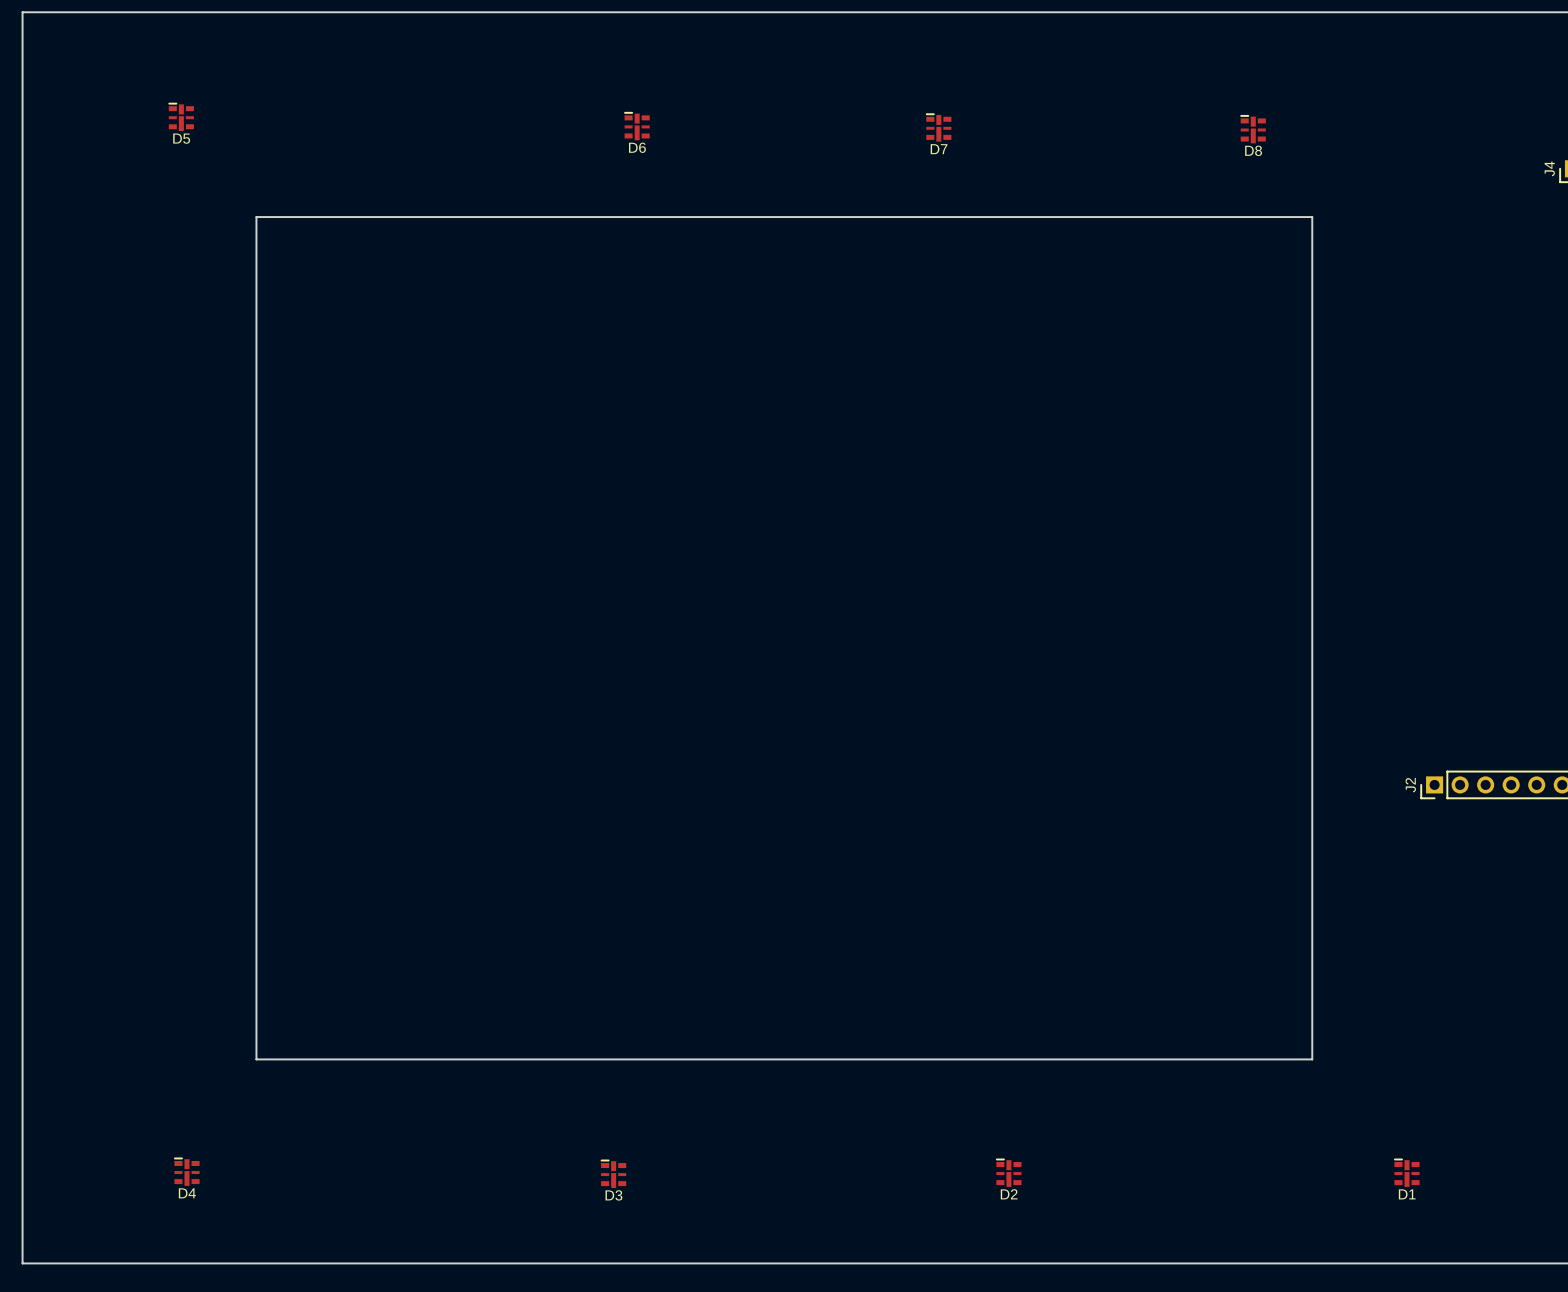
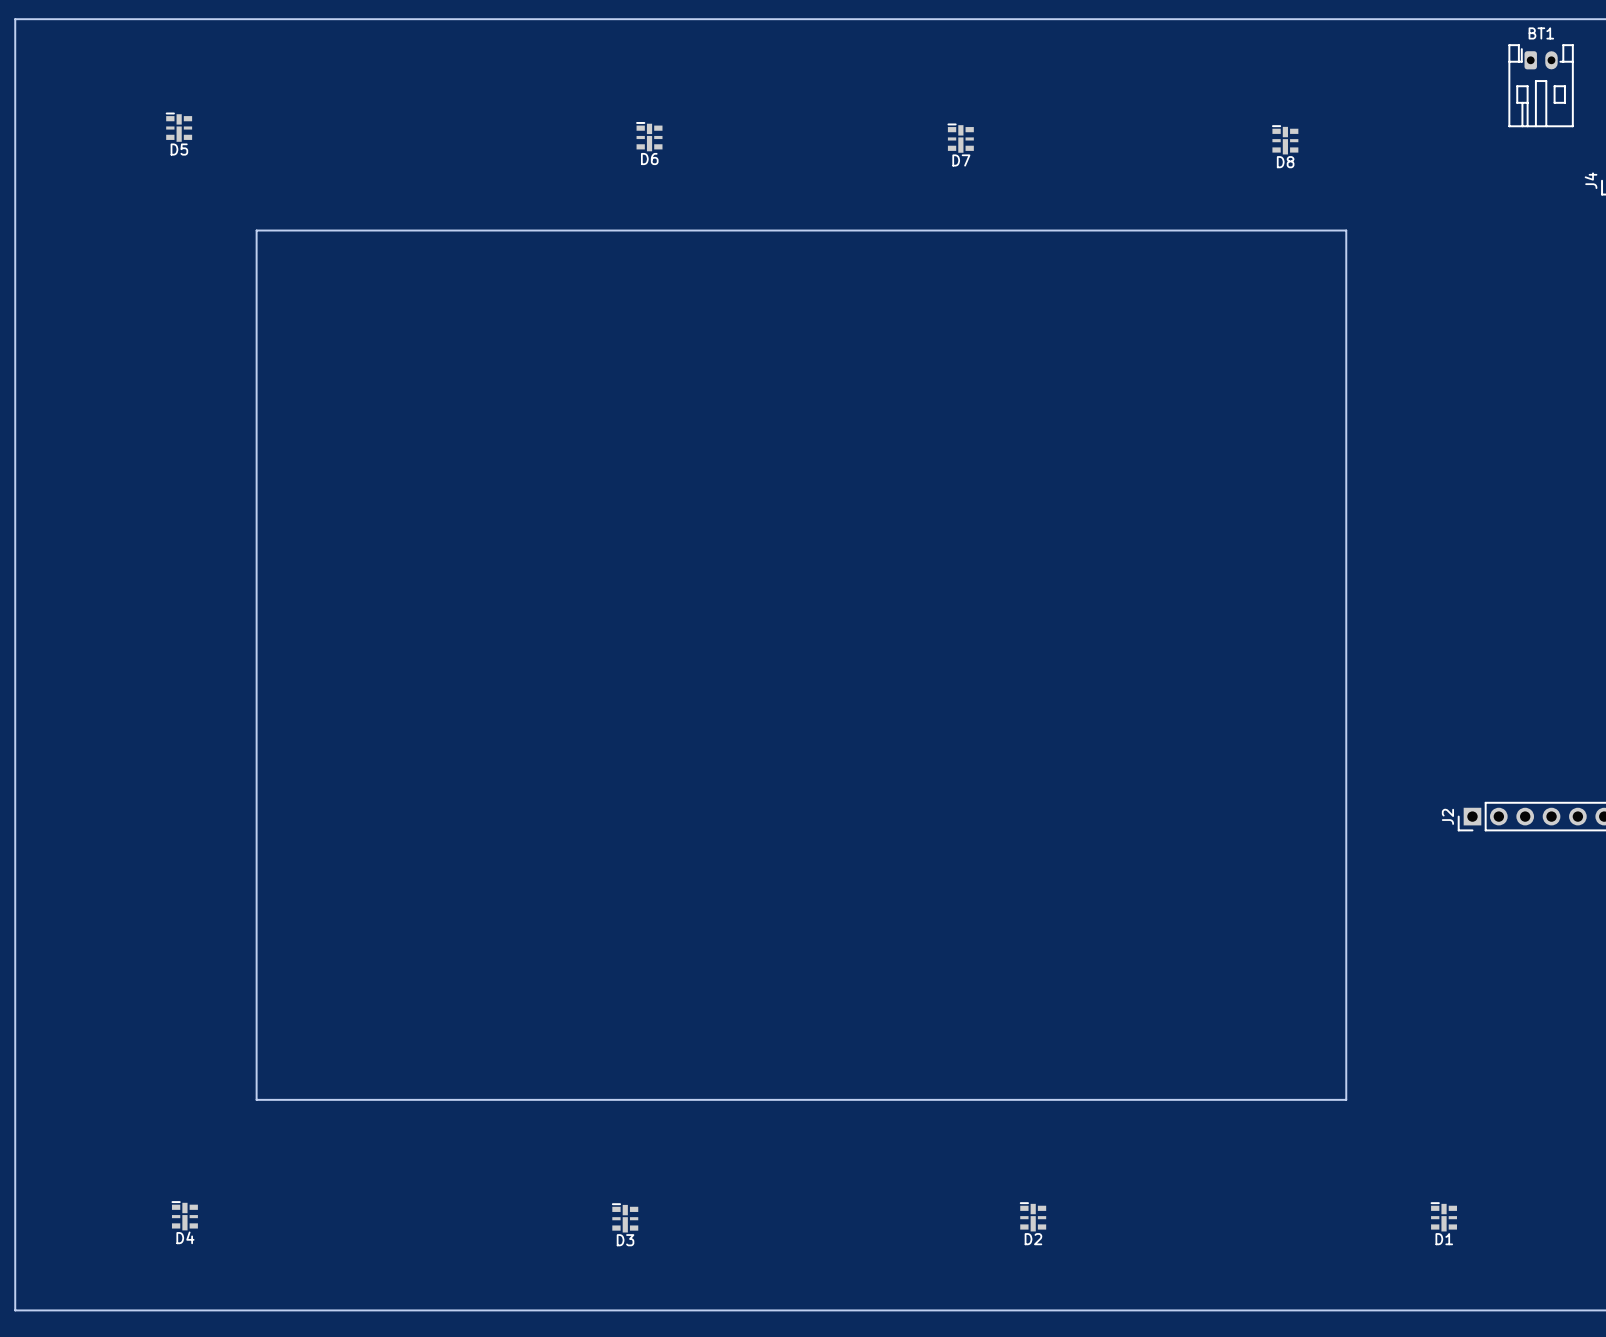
BT1: none -> (1541, 85)

